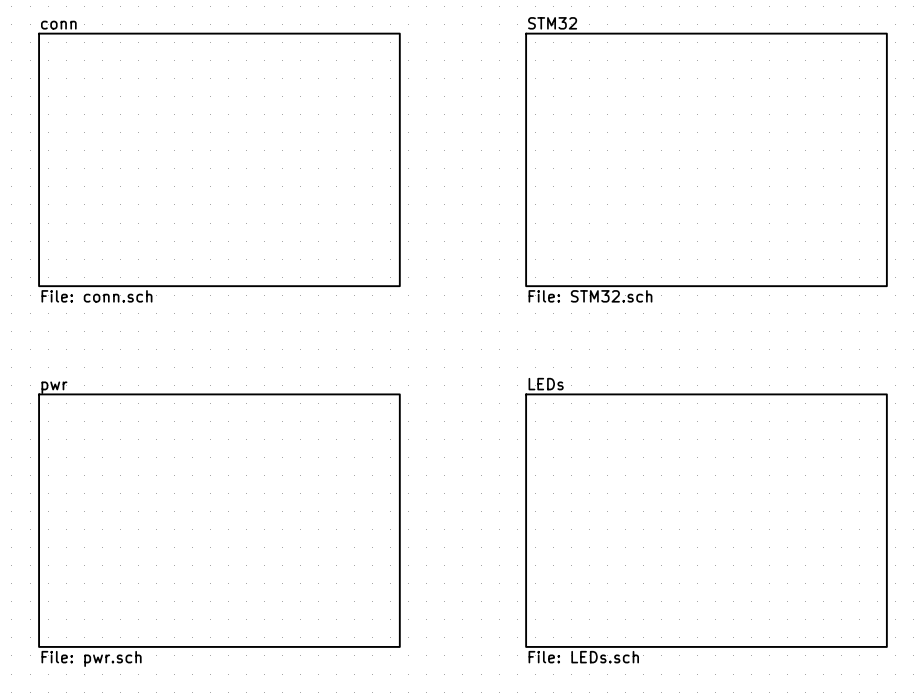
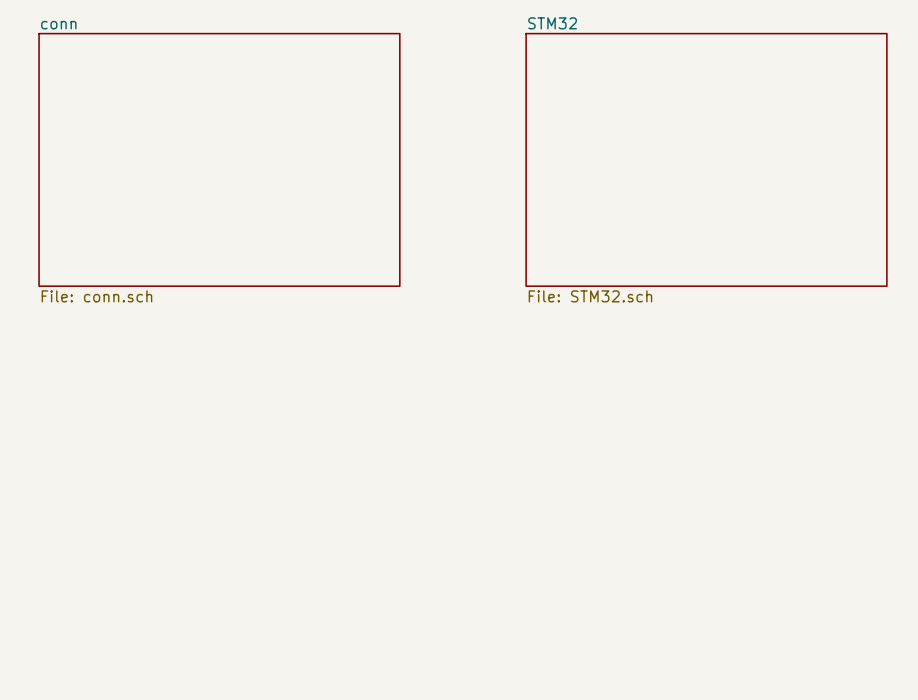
sheet pwr: File: pwr.sch (219, 520) -> none
sheet LEDs: File: LEDs.sch (706, 520) -> none

